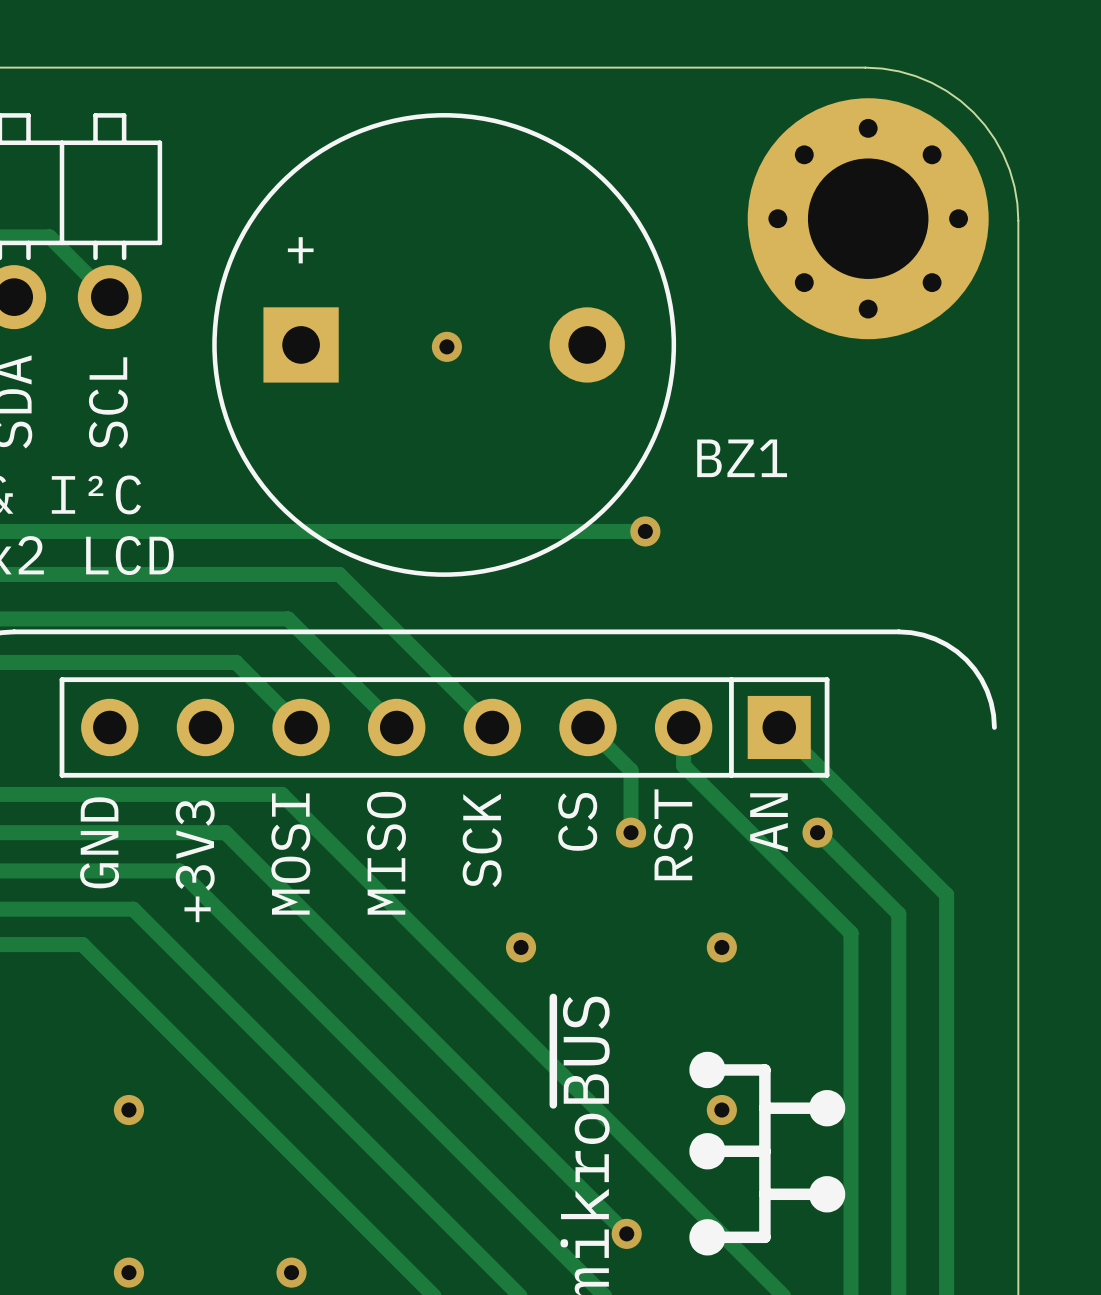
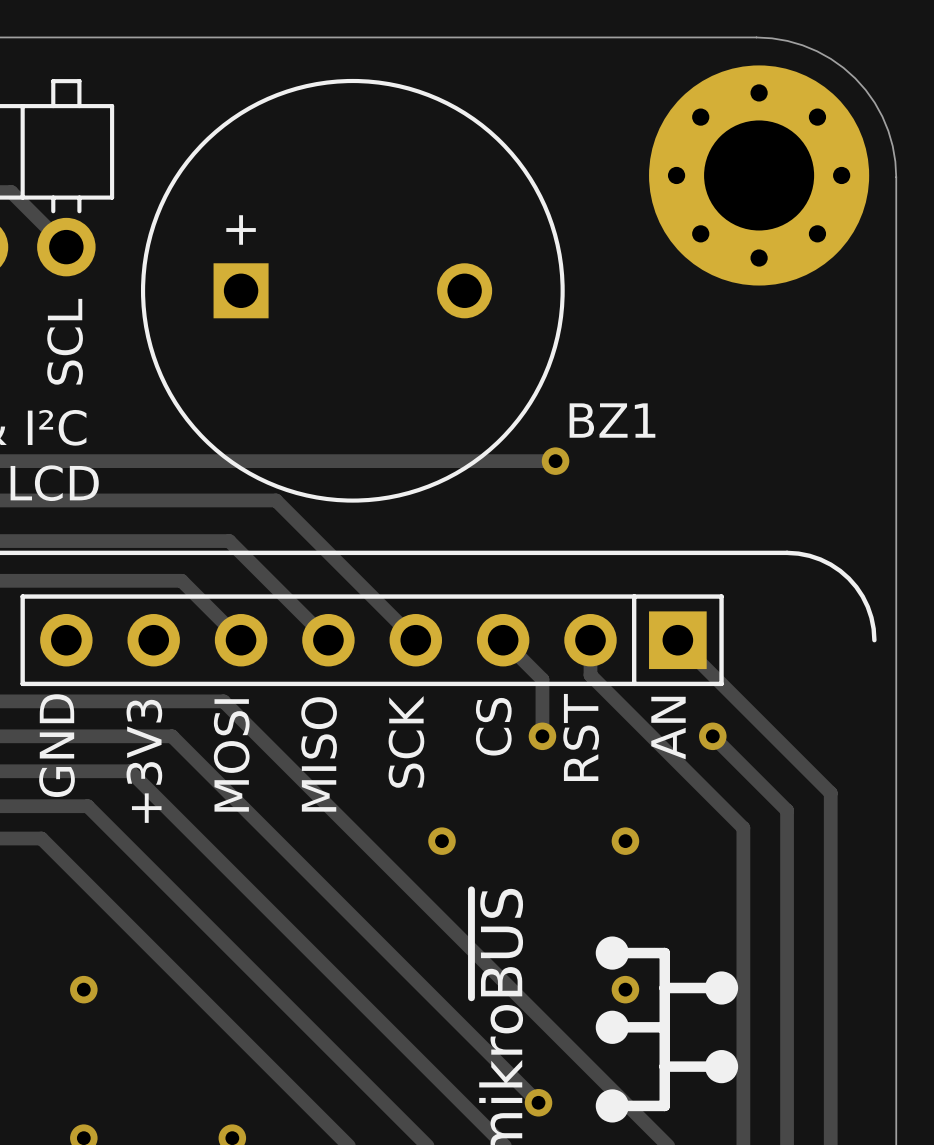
BZ1 footprint: [212, 113, 677, 577] -> [140, 78, 565, 503]
via: (446, 346) -> none

